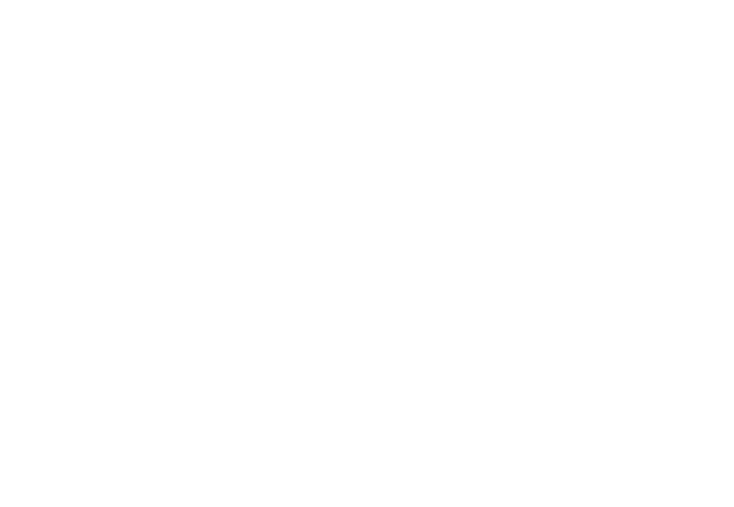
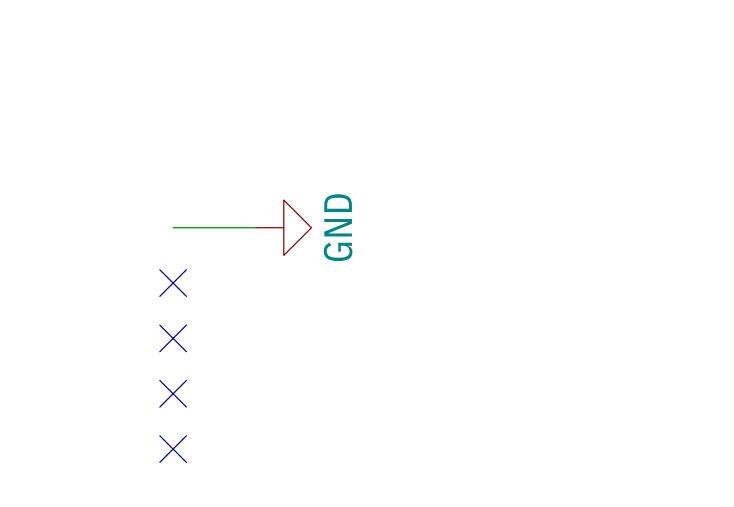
wire: none -> (173, 227) (256, 227)
power symbol: none -> GND (283, 227)
no-connect mark: none -> (173, 283)
no-connect mark: none -> (173, 338)
no-connect mark: none -> (173, 393)
no-connect mark: none -> (173, 449)

